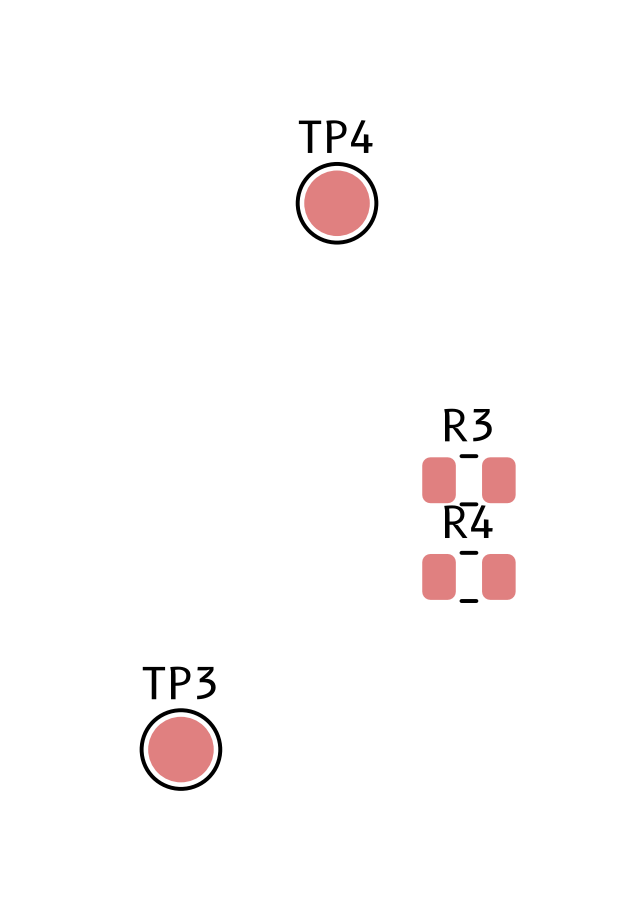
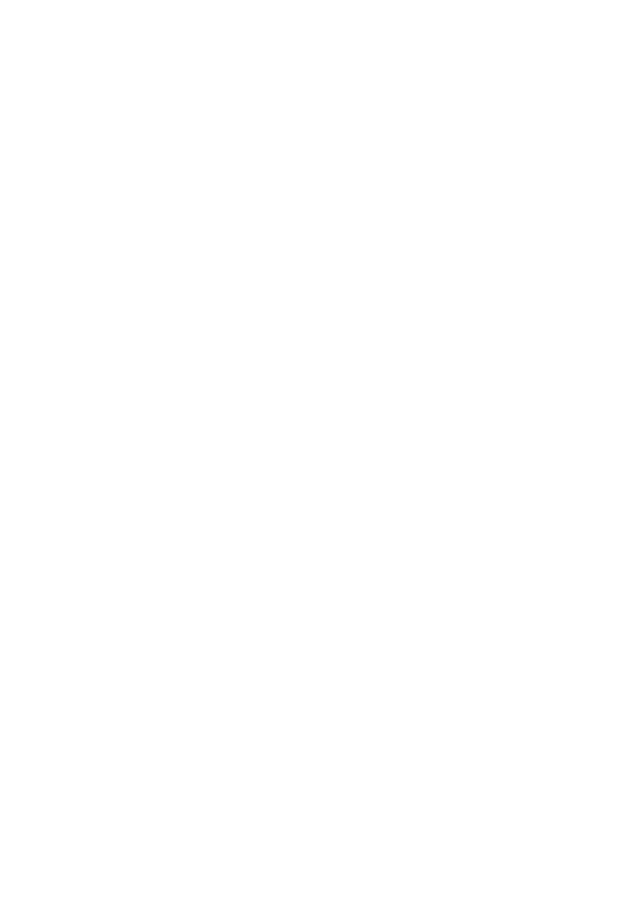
TP4: (337, 203) -> none
R3: (468, 480) -> none
R4: (468, 576) -> none
TP3: (180, 749) -> none

